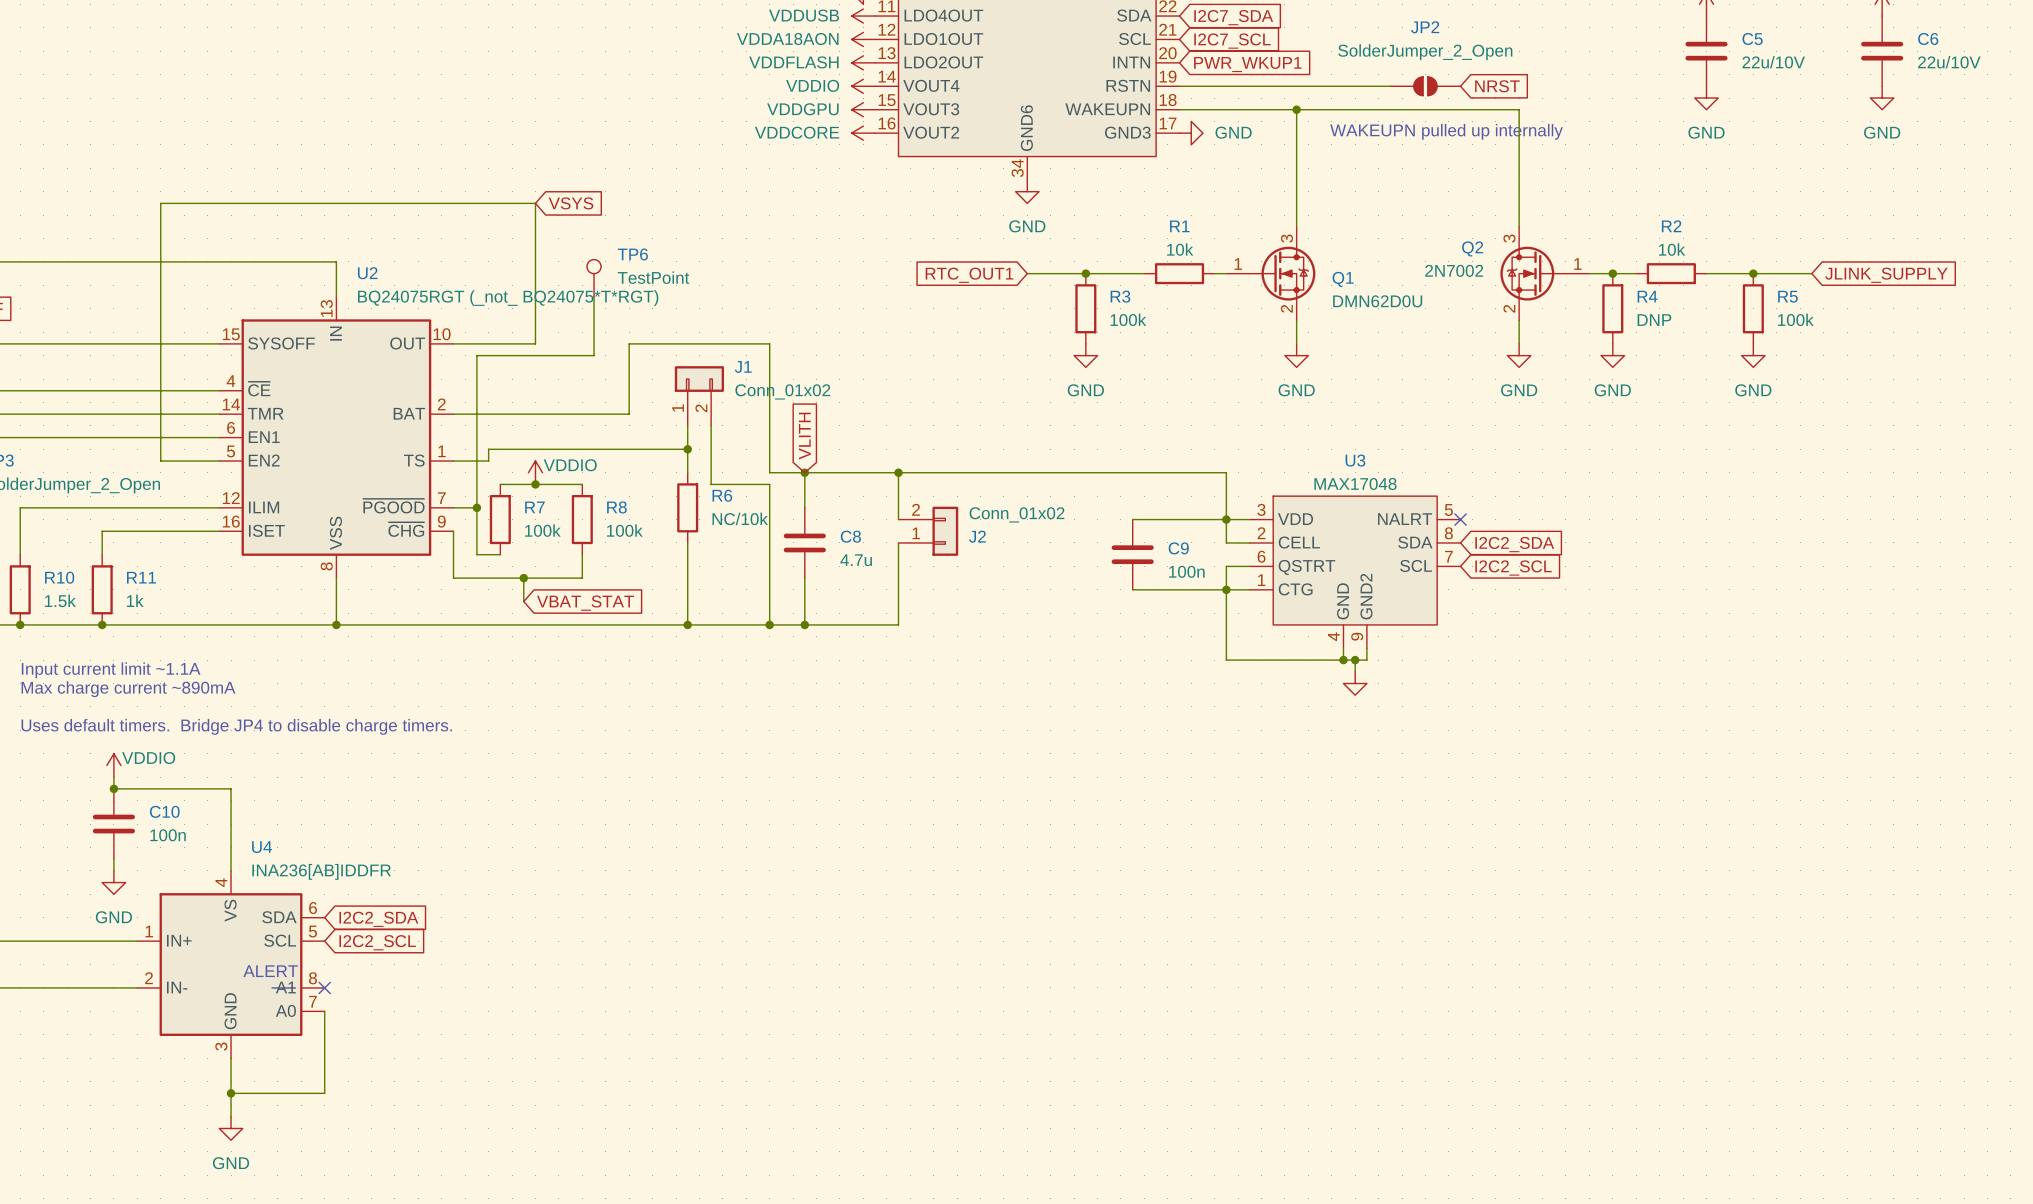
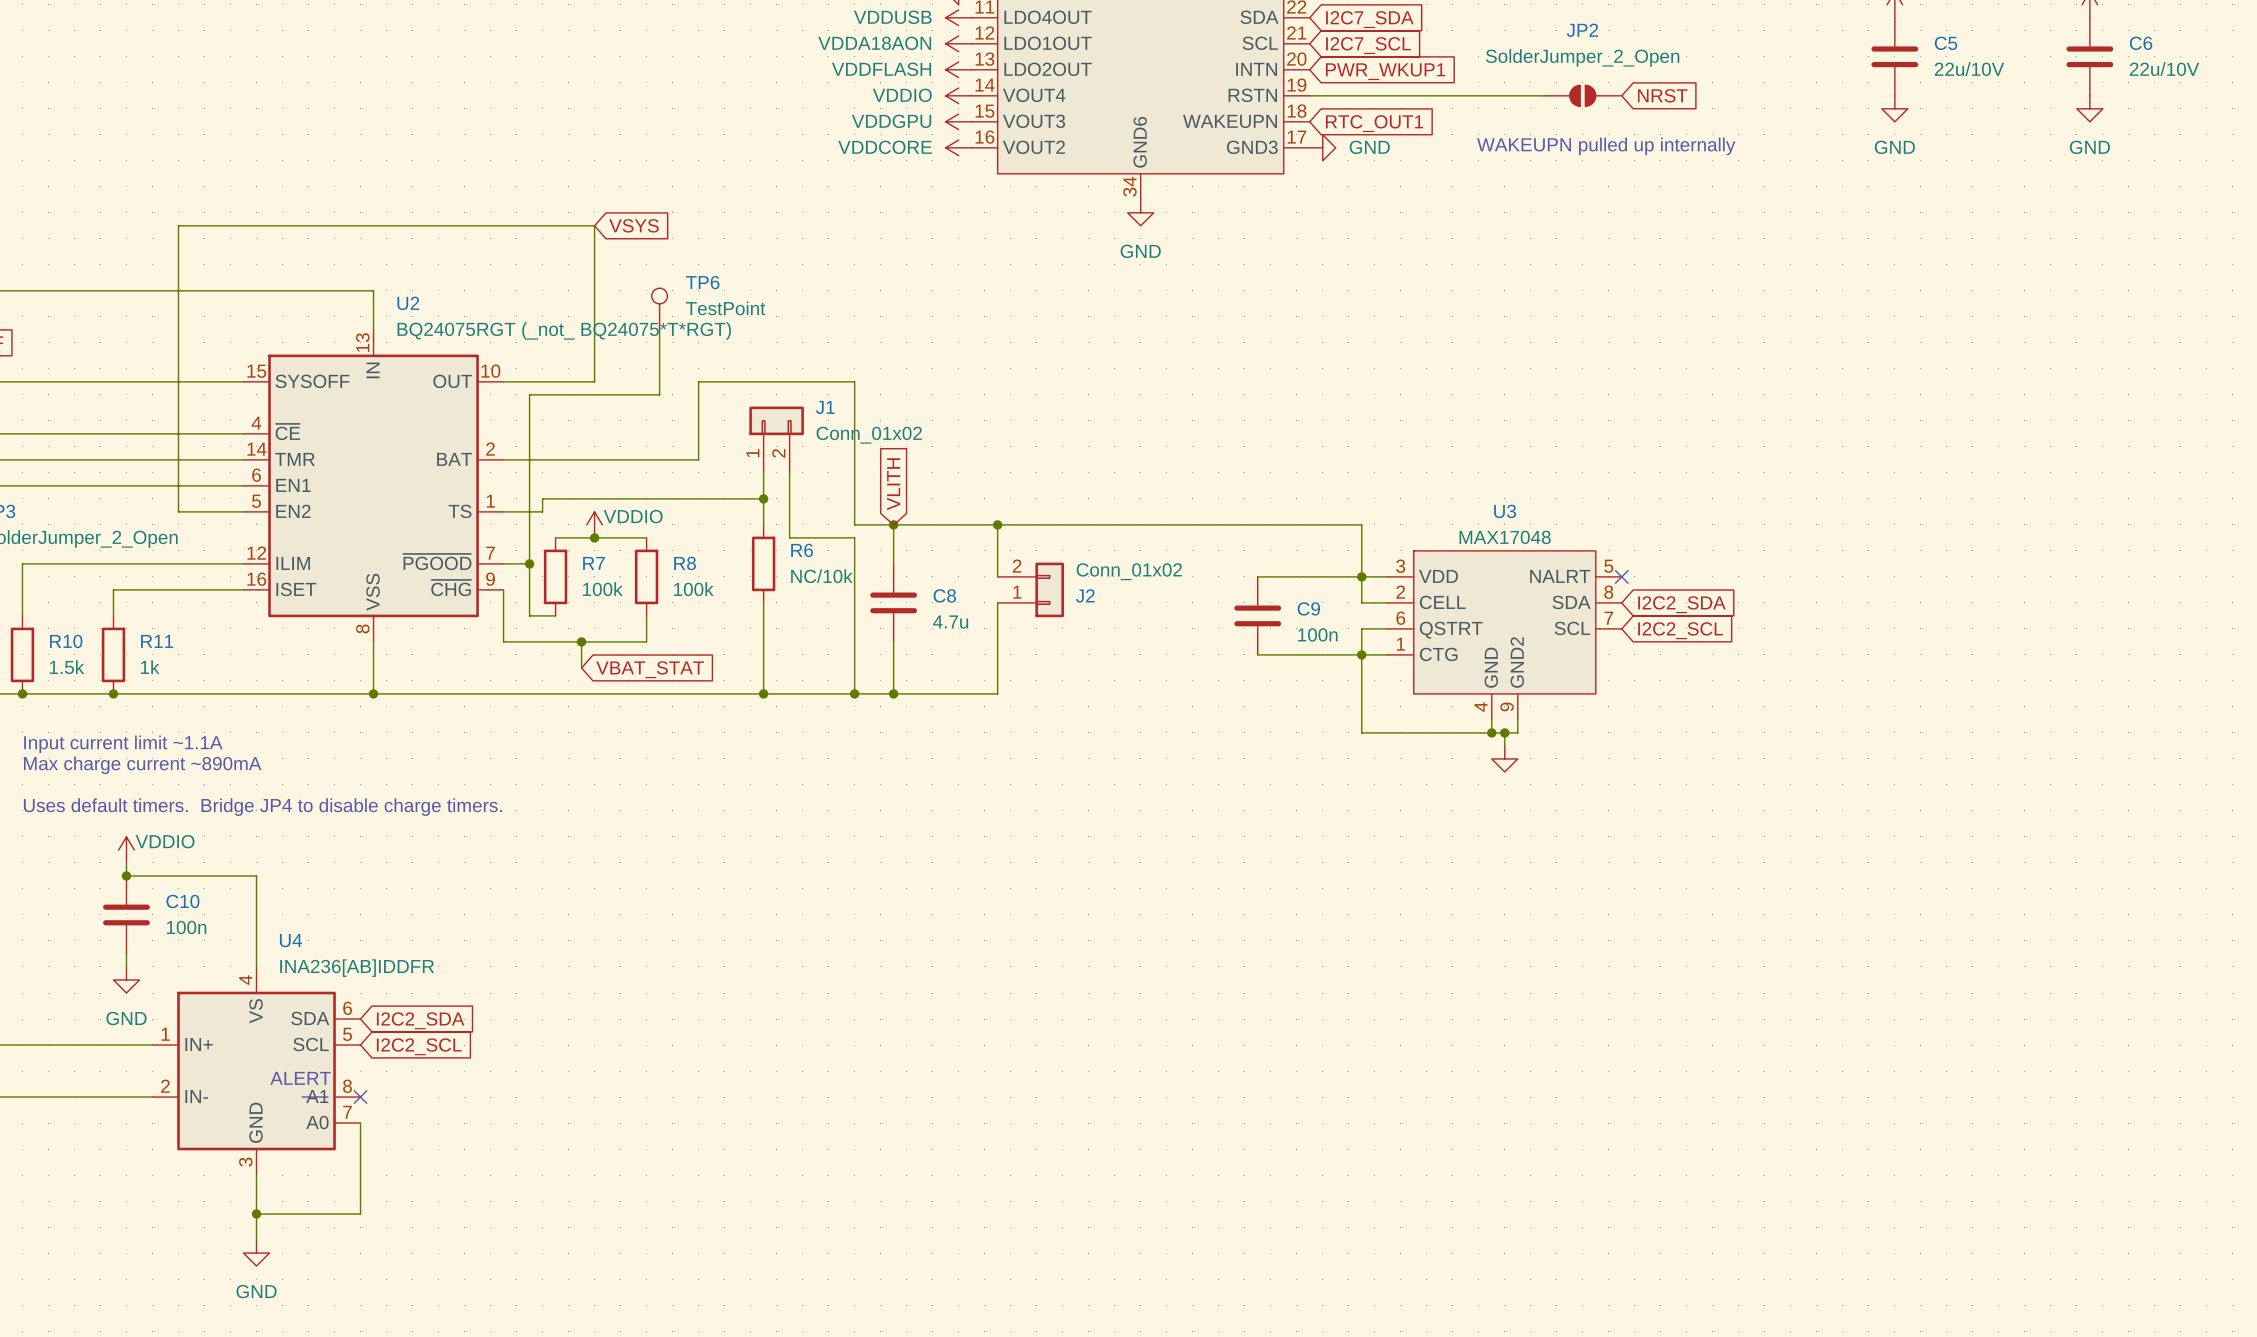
wire: (1179, 109) (1519, 109) (1519, 226) -> none
wire: (1296, 109) (1296, 226) -> none
junction: (1296, 109) -> none
wire: (1027, 273) (1144, 273) -> none
junction: (1085, 273) -> none
R1: 10k (1179, 273) -> none
wire: (1214, 273) (1226, 273) -> none
Q1: DMN62D0U (1270, 273) -> none
Q2: 2N7002 (1544, 273) -> none
wire: (1589, 273) (1636, 273) -> none
junction: (1612, 273) -> none
R2: 10k (1671, 273) -> none
wire: (1706, 273) (1811, 273) -> none
junction: (1753, 273) -> none
global label rotation: 0° (969, 275) -> 180° (1374, 123)
global label position: RTC_OUT1 (969, 275) -> RTC_OUT1 (1374, 123)
global label: JLINK_SUPPLY (1886, 275) -> none
R3: 100k (1085, 308) -> none
R4: DNP (1612, 308) -> none
R5: 100k (1753, 308) -> none
wire: (1296, 320) (1296, 343) -> none
wire: (1519, 320) (1519, 343) -> none
power symbol: GND (1085, 355) -> none
power symbol: GND (1296, 355) -> none
power symbol: GND (1519, 355) -> none
power symbol: GND (1612, 355) -> none
power symbol: GND (1753, 355) -> none

